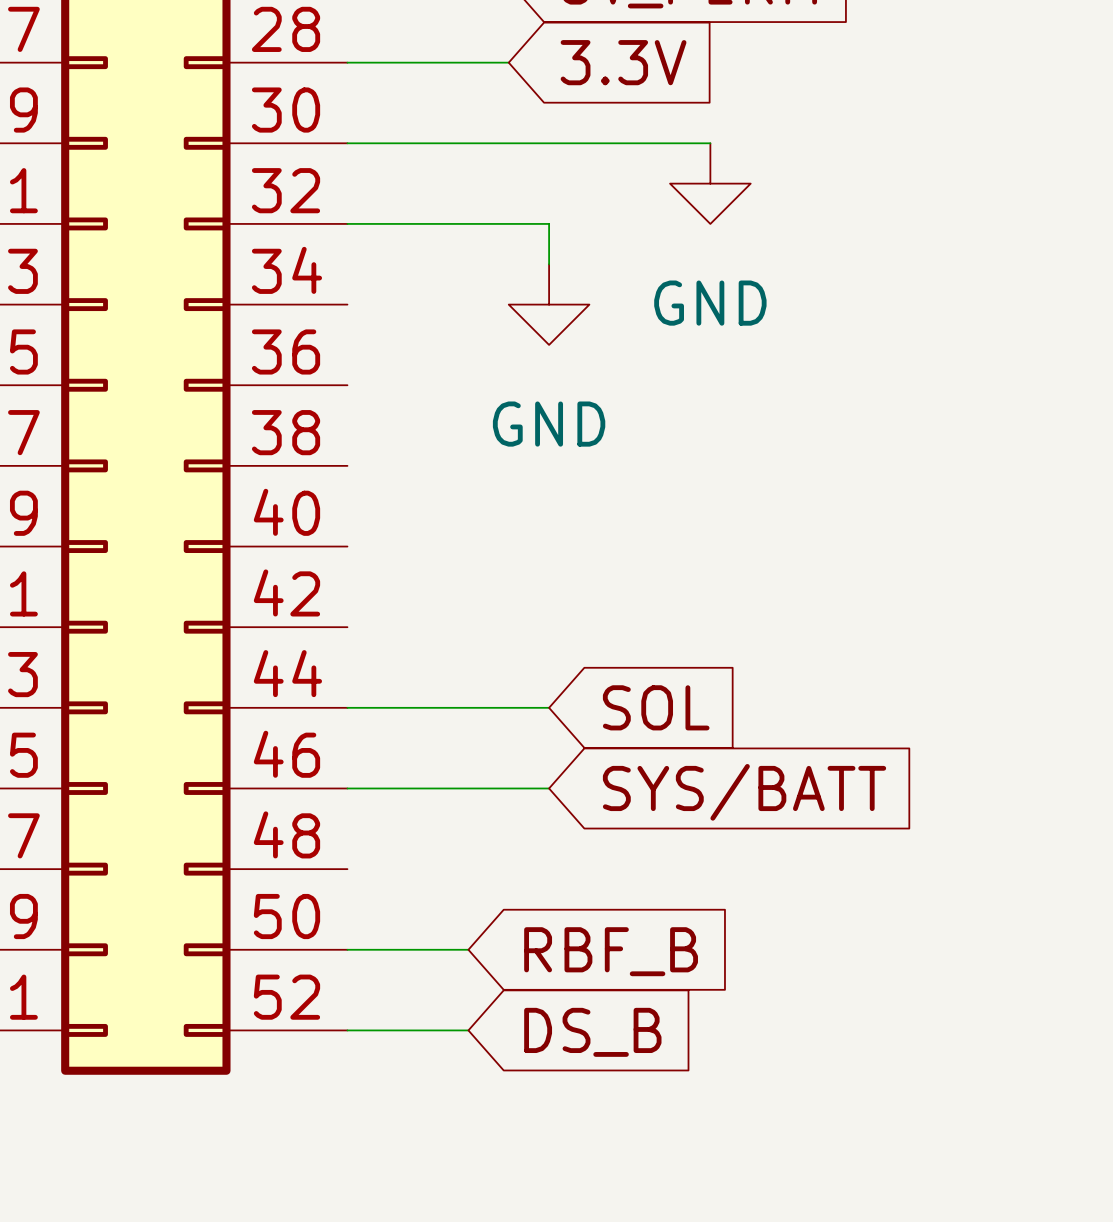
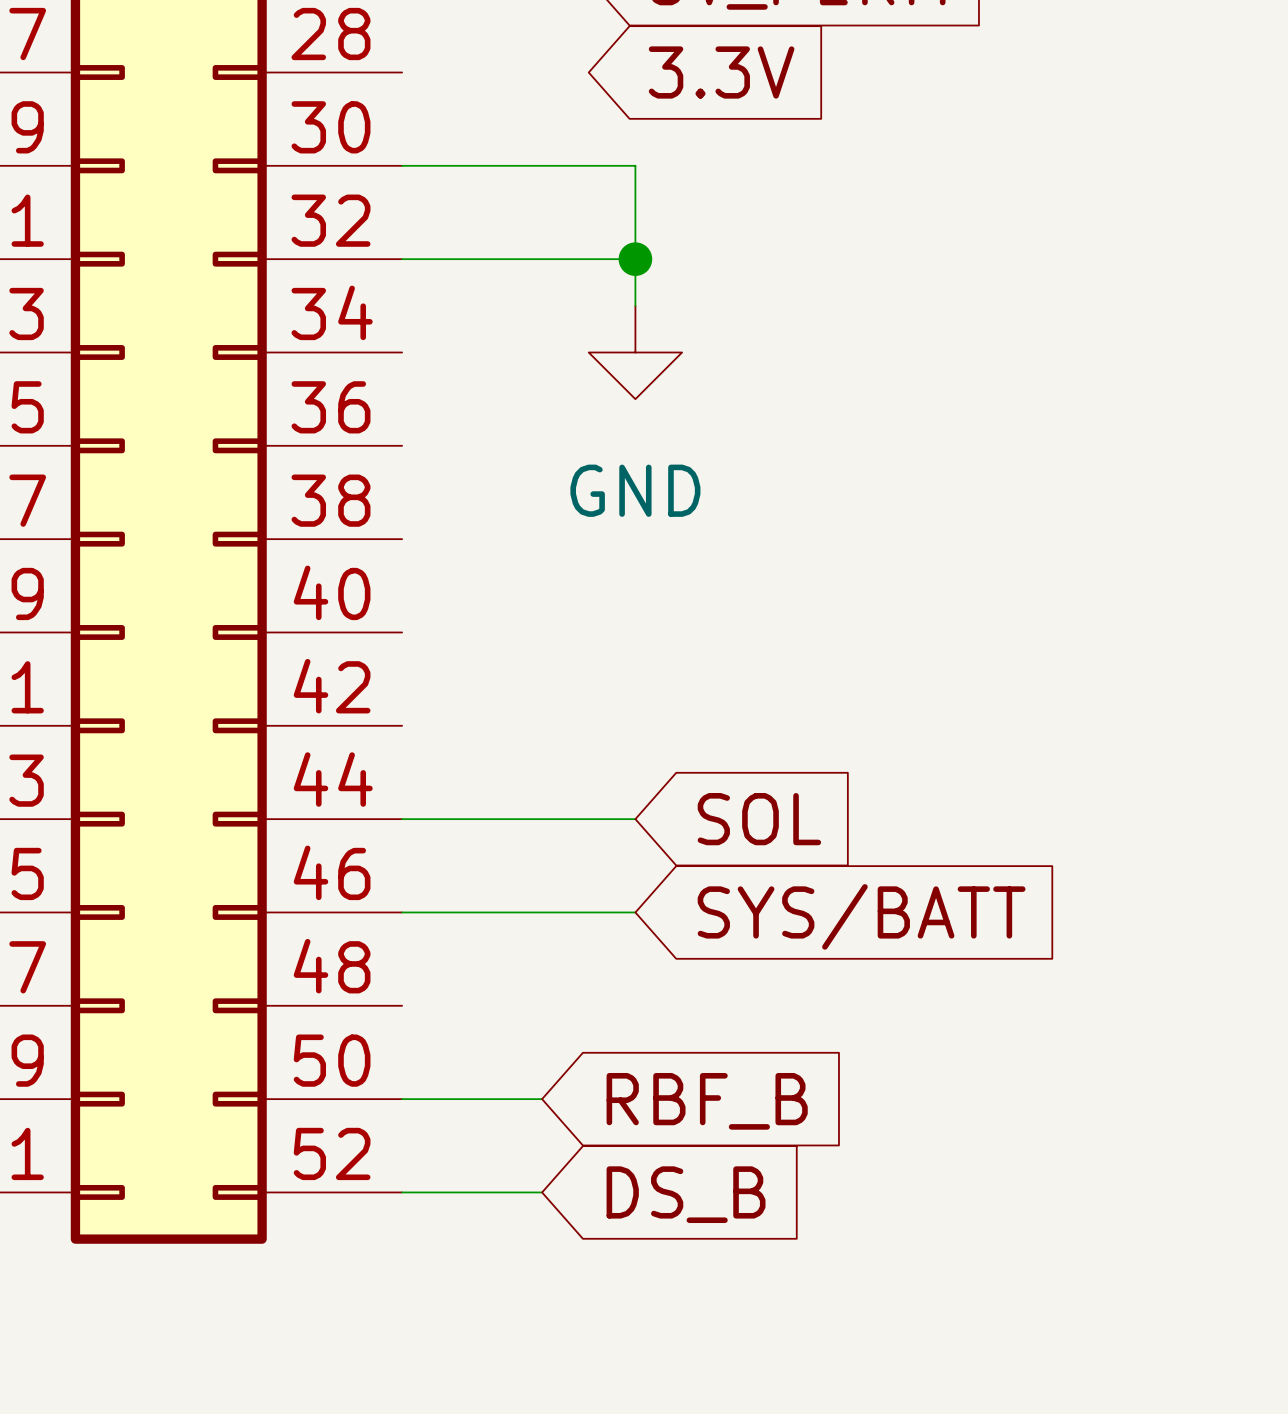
wire: (347, 62) (508, 62) -> none
wire: (549, 143) (710, 143) -> (635, 165) (635, 259)
power symbol: GND (710, 183) -> none
junction: none -> (635, 259)

